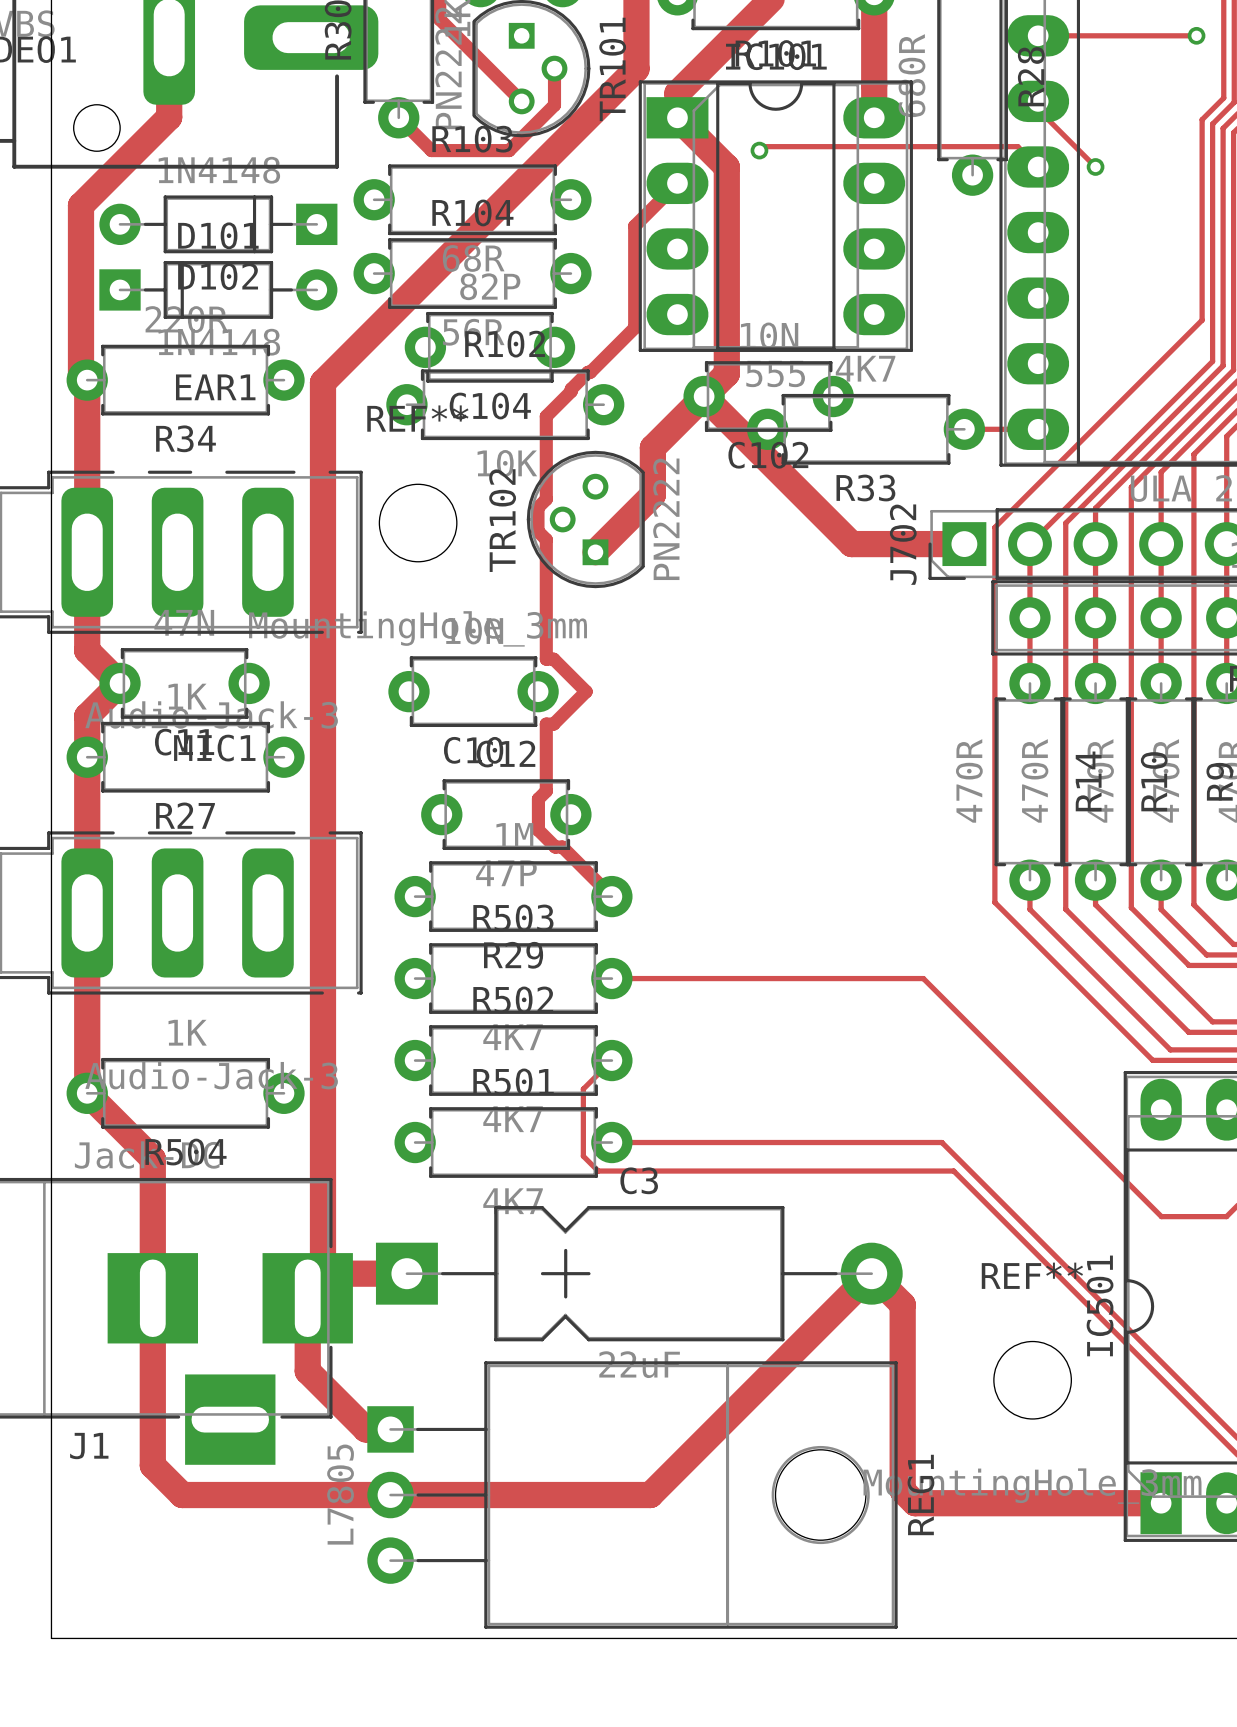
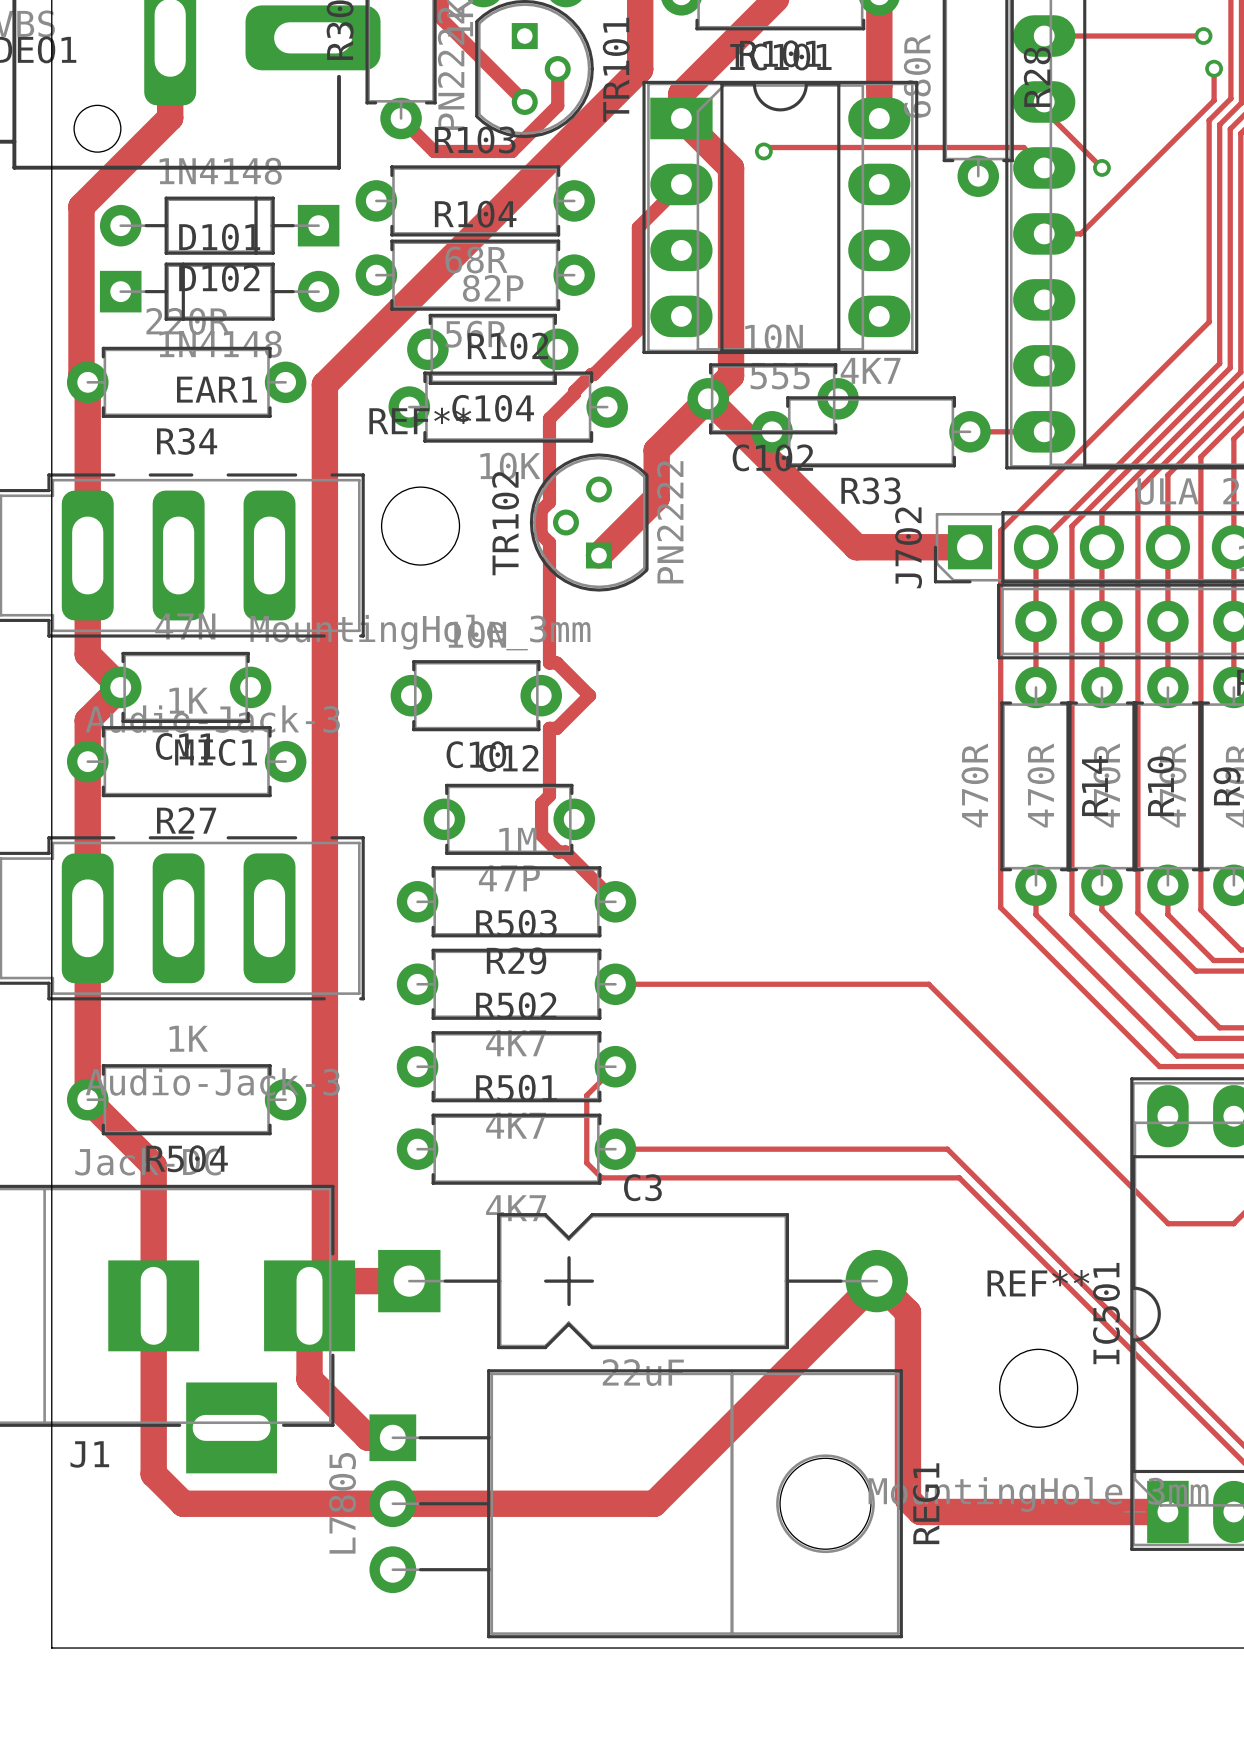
track: none -> (1214, 68) (1214, 100) (1080, 233) (1044, 233)
via: none -> (1214, 68)

